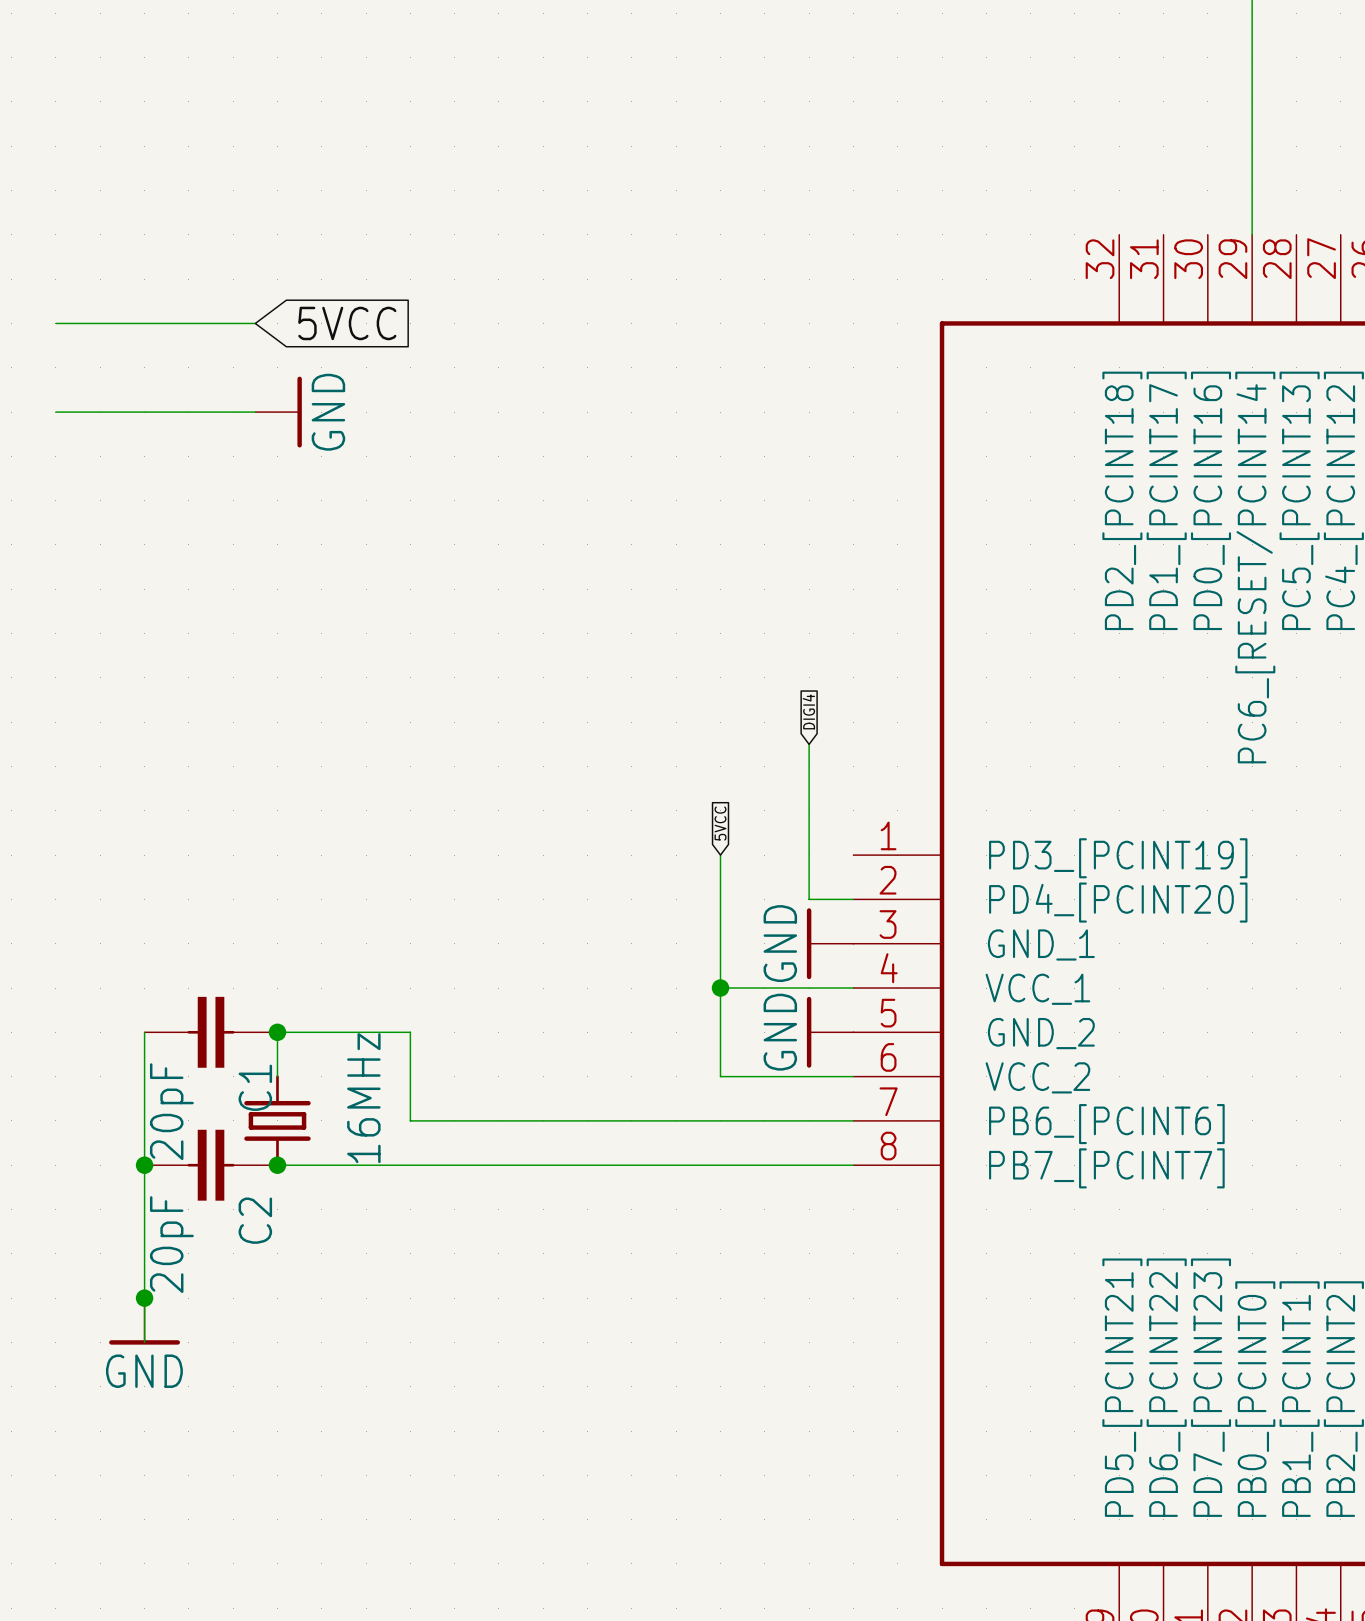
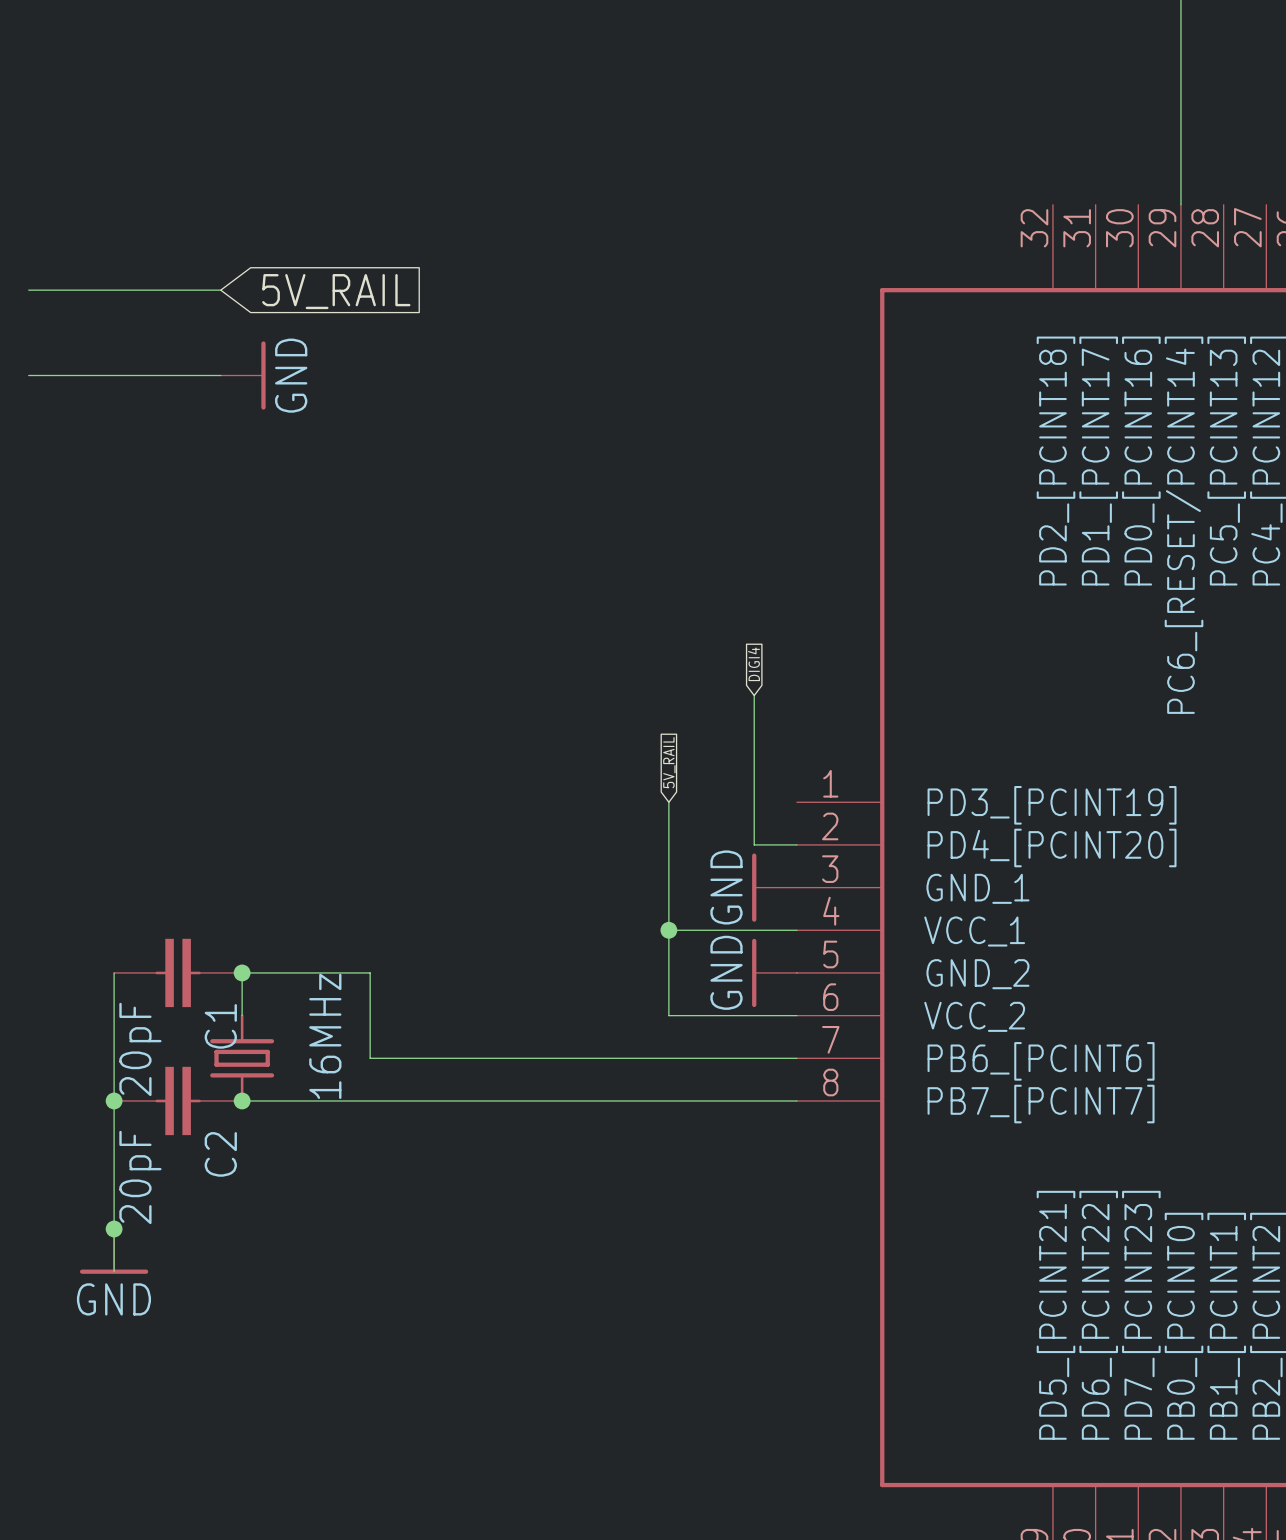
global label: 5VCC (347, 323) -> 5V_RAIL (336, 291)
global label: 5VCC (720, 823) -> 5V_RAIL (669, 762)

